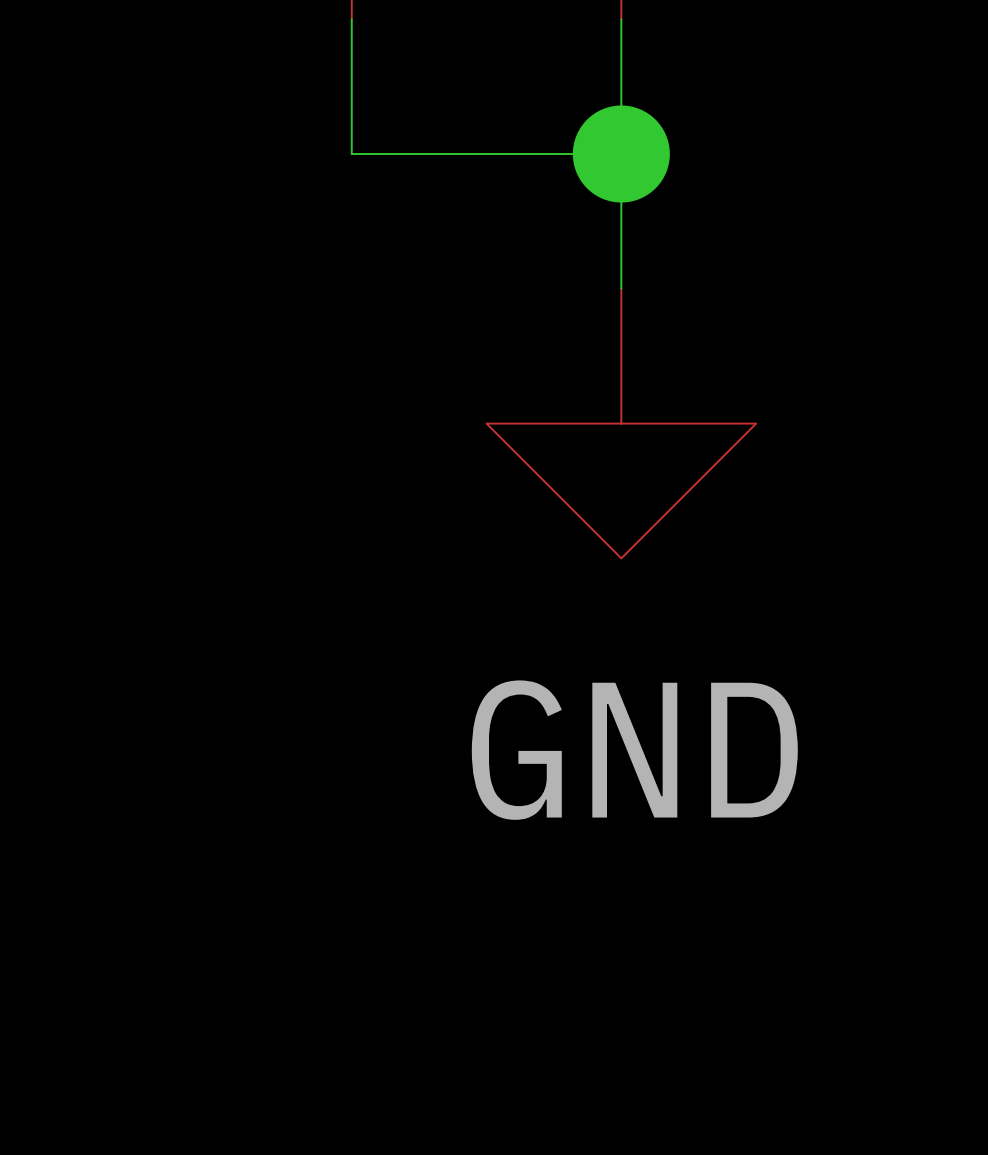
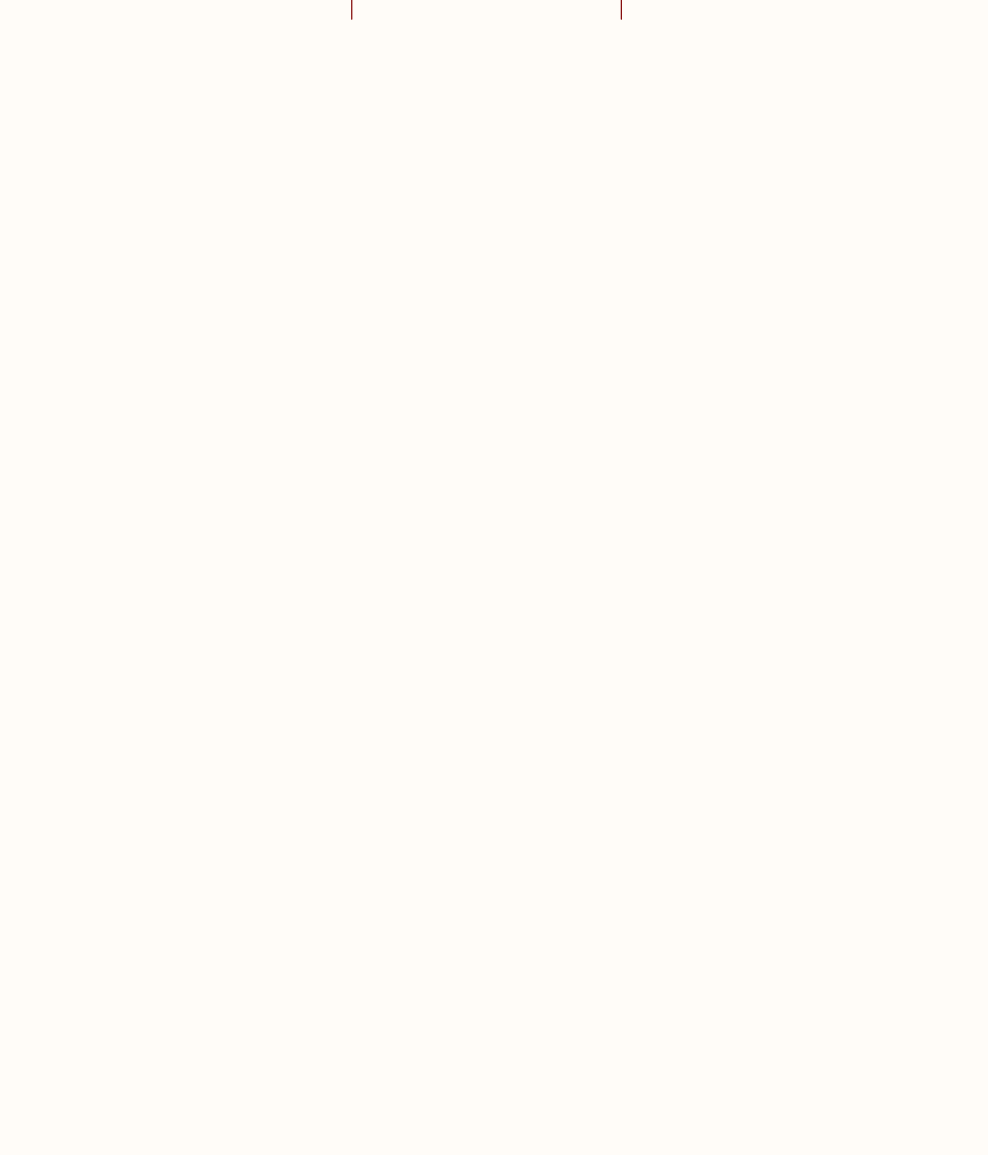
wire: (351, 19) (351, 154) (621, 154) -> none
wire: (621, 19) (621, 288) -> none
junction: (621, 154) -> none
power symbol: GND (621, 423) -> none

